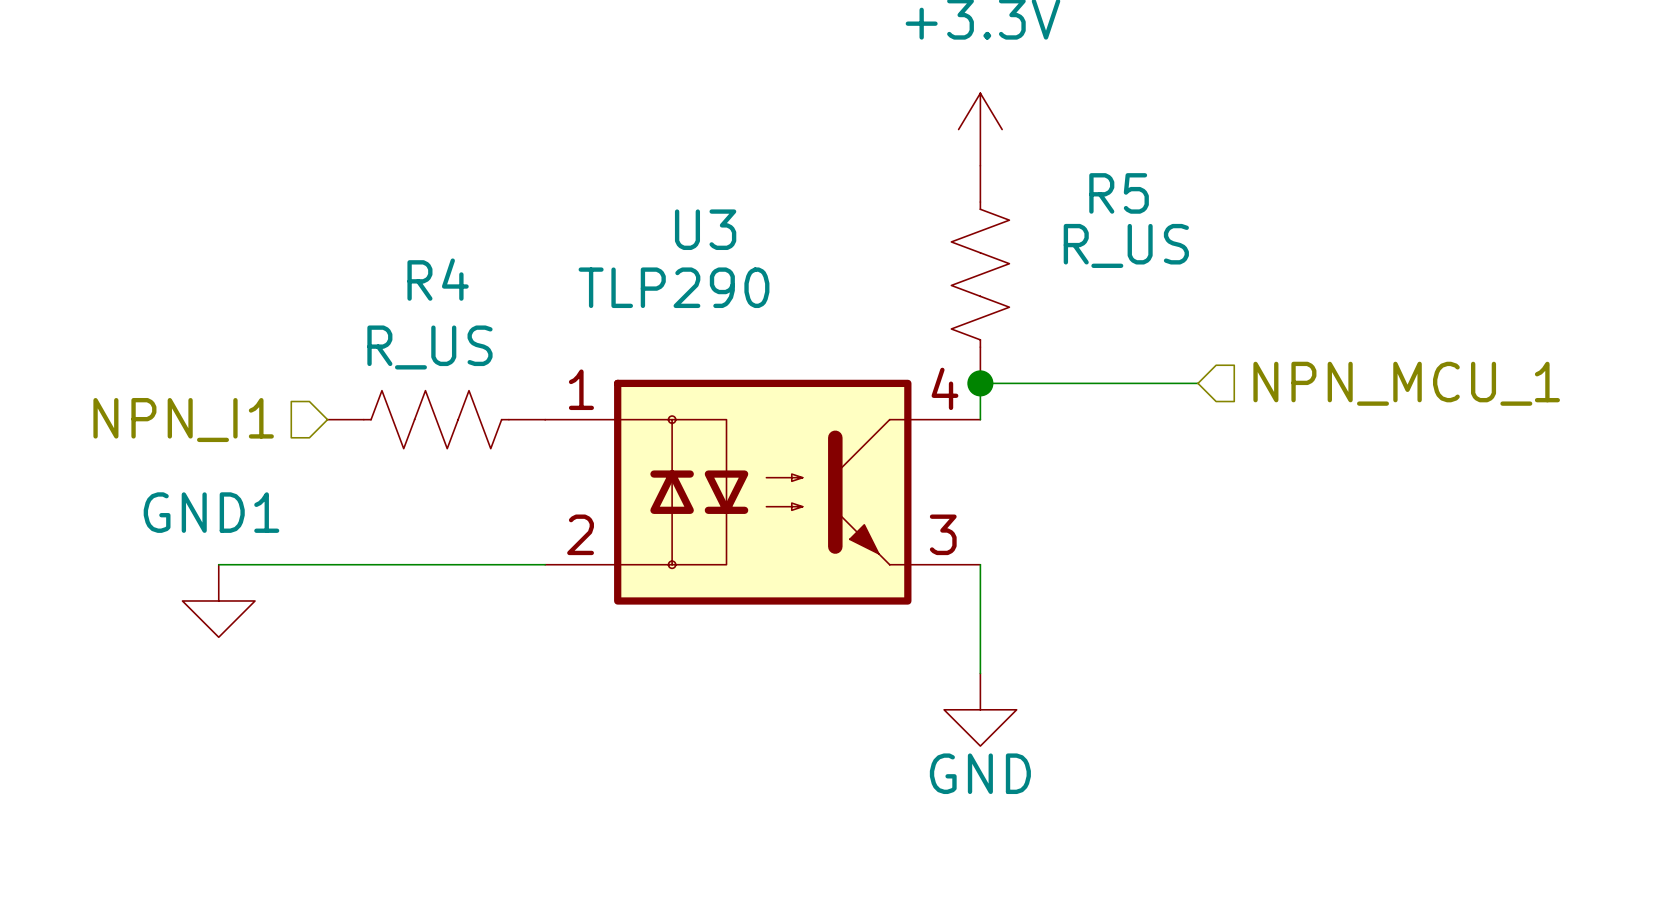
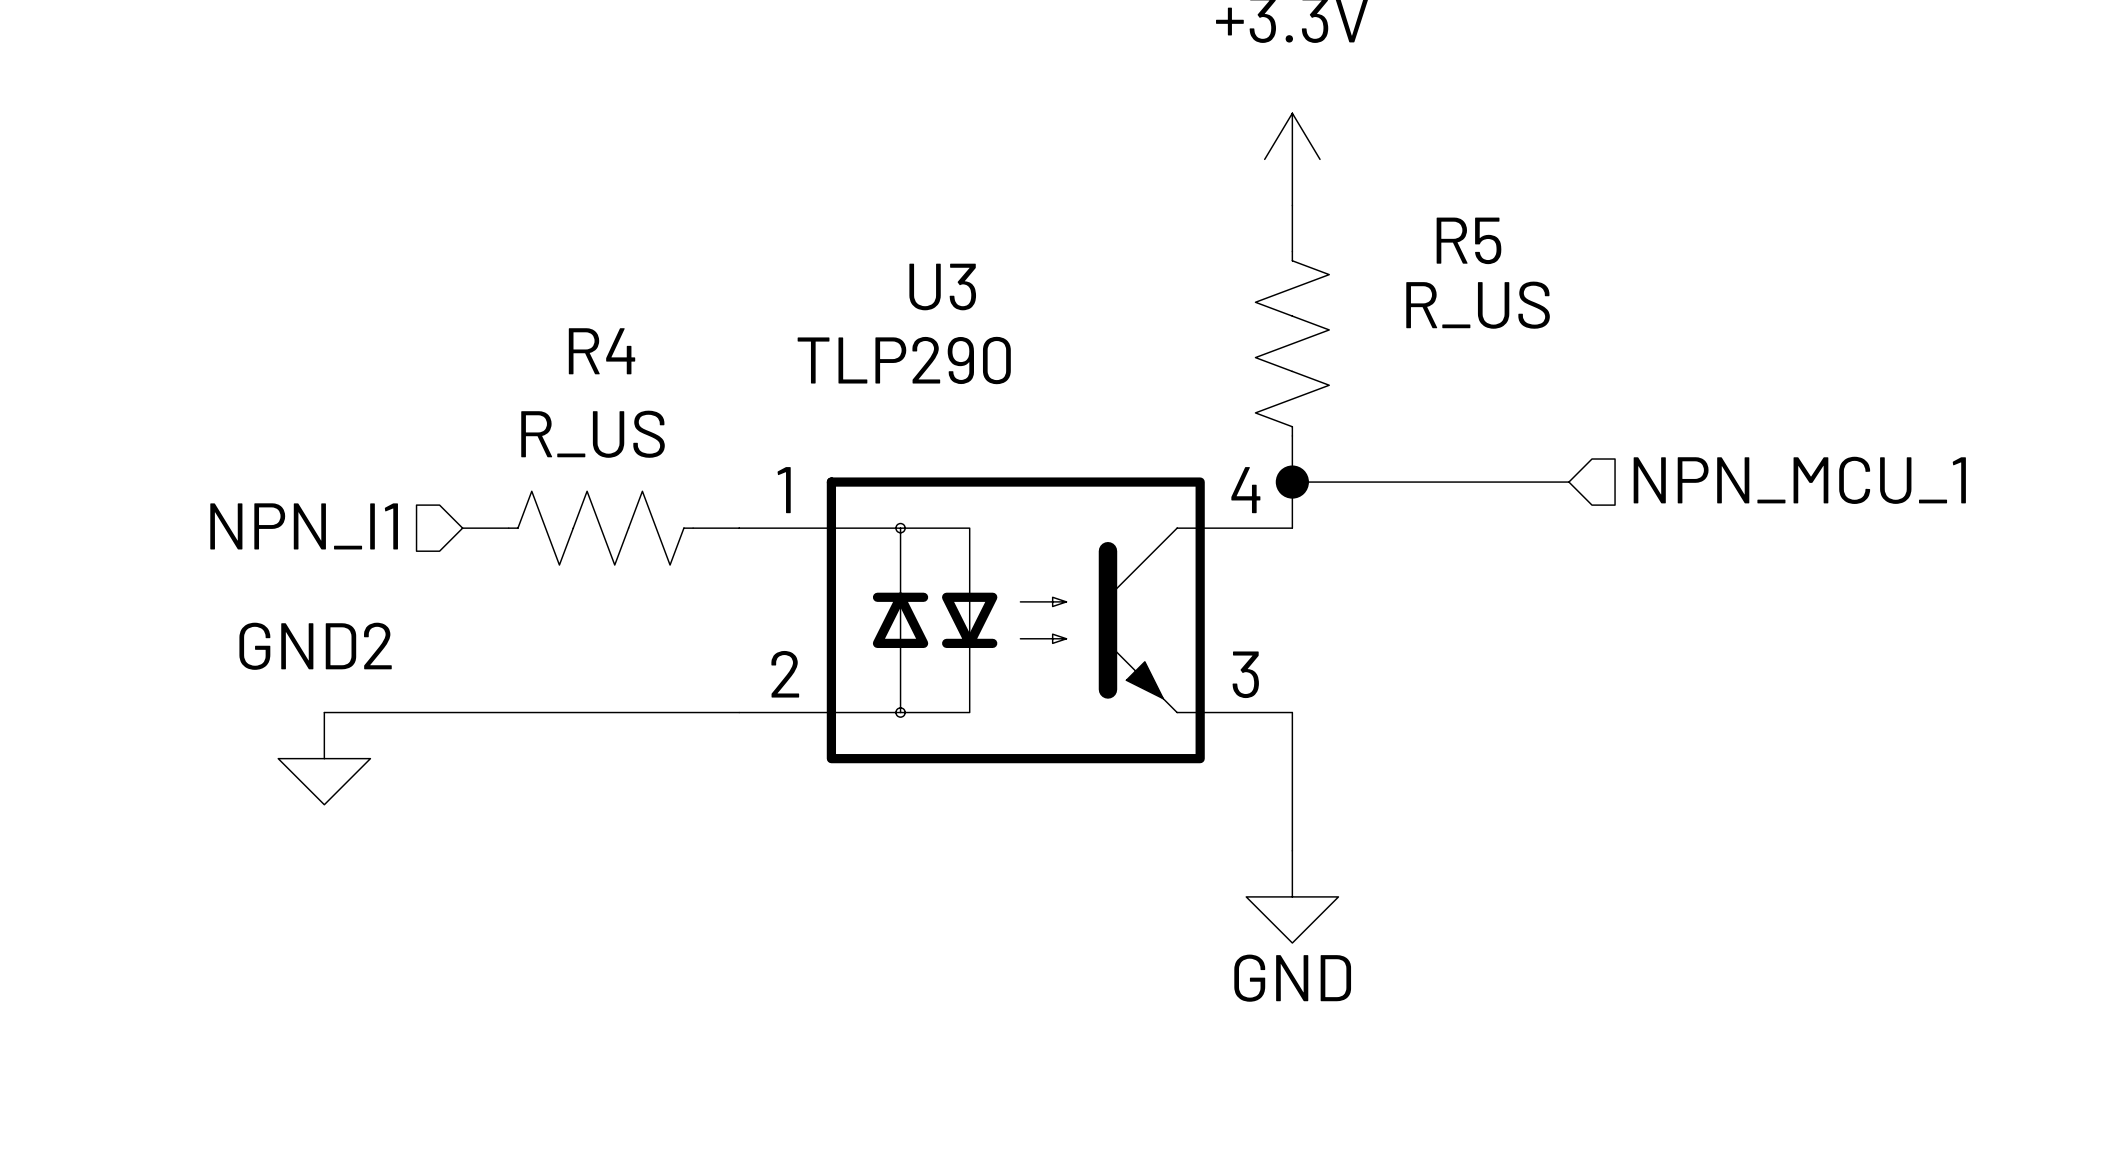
power symbol: GND1 (218, 600) -> GND2 (324, 758)

